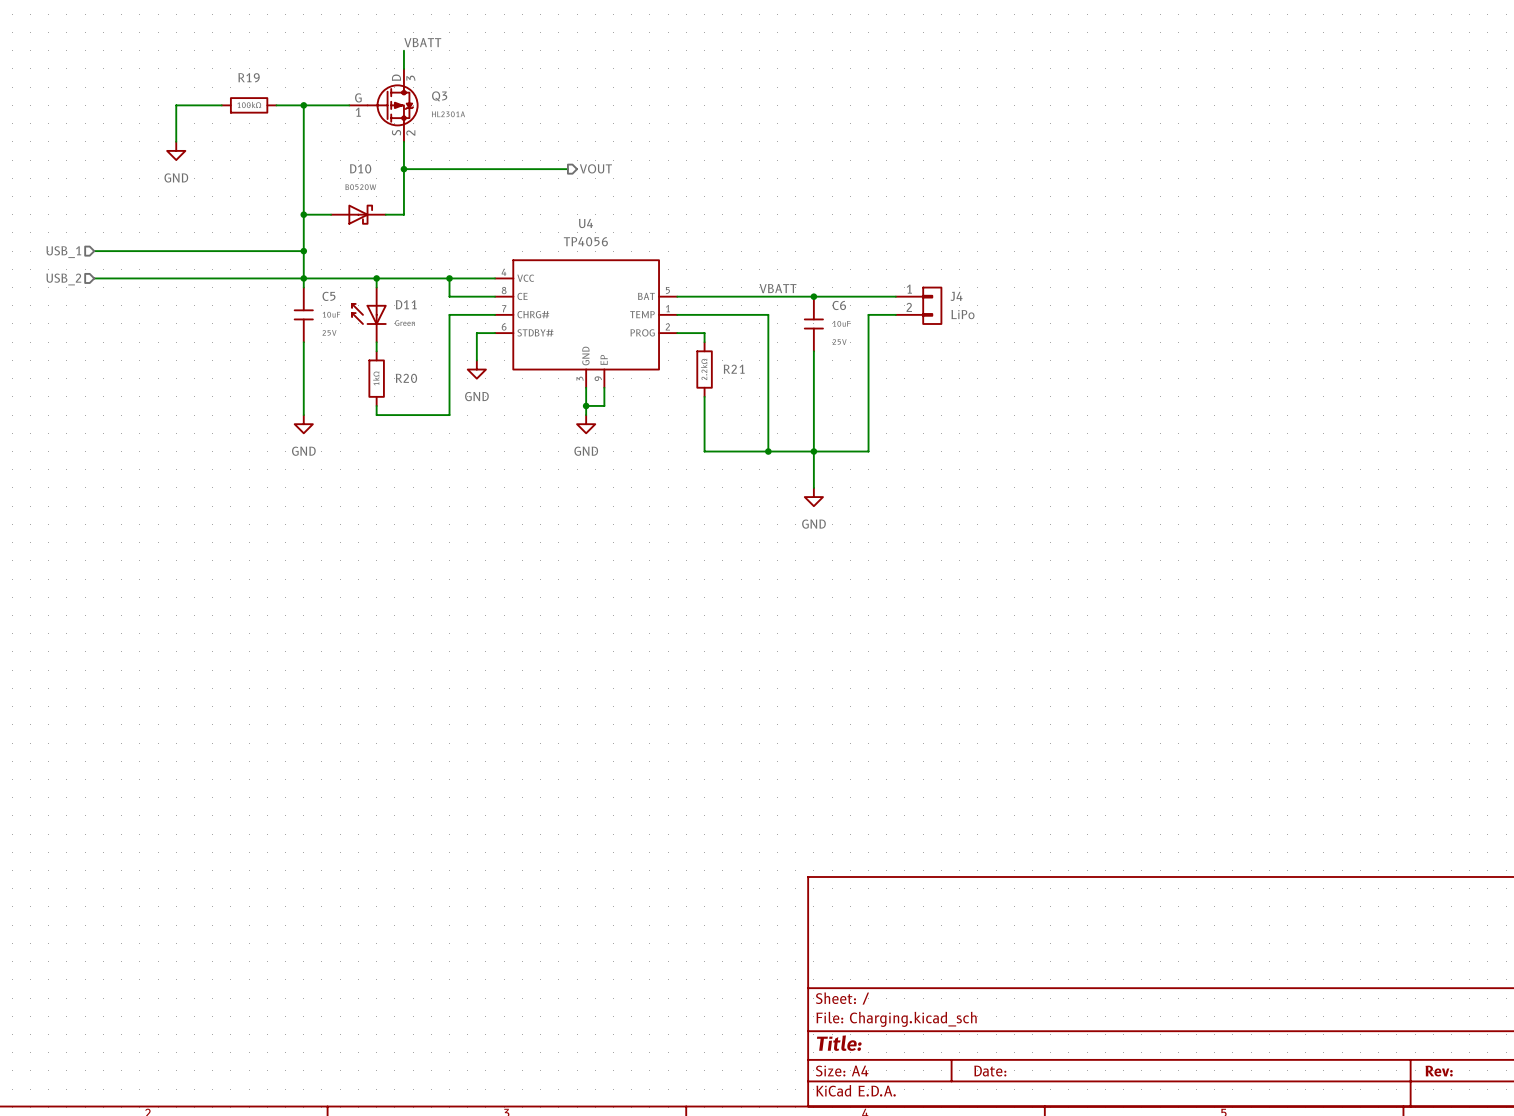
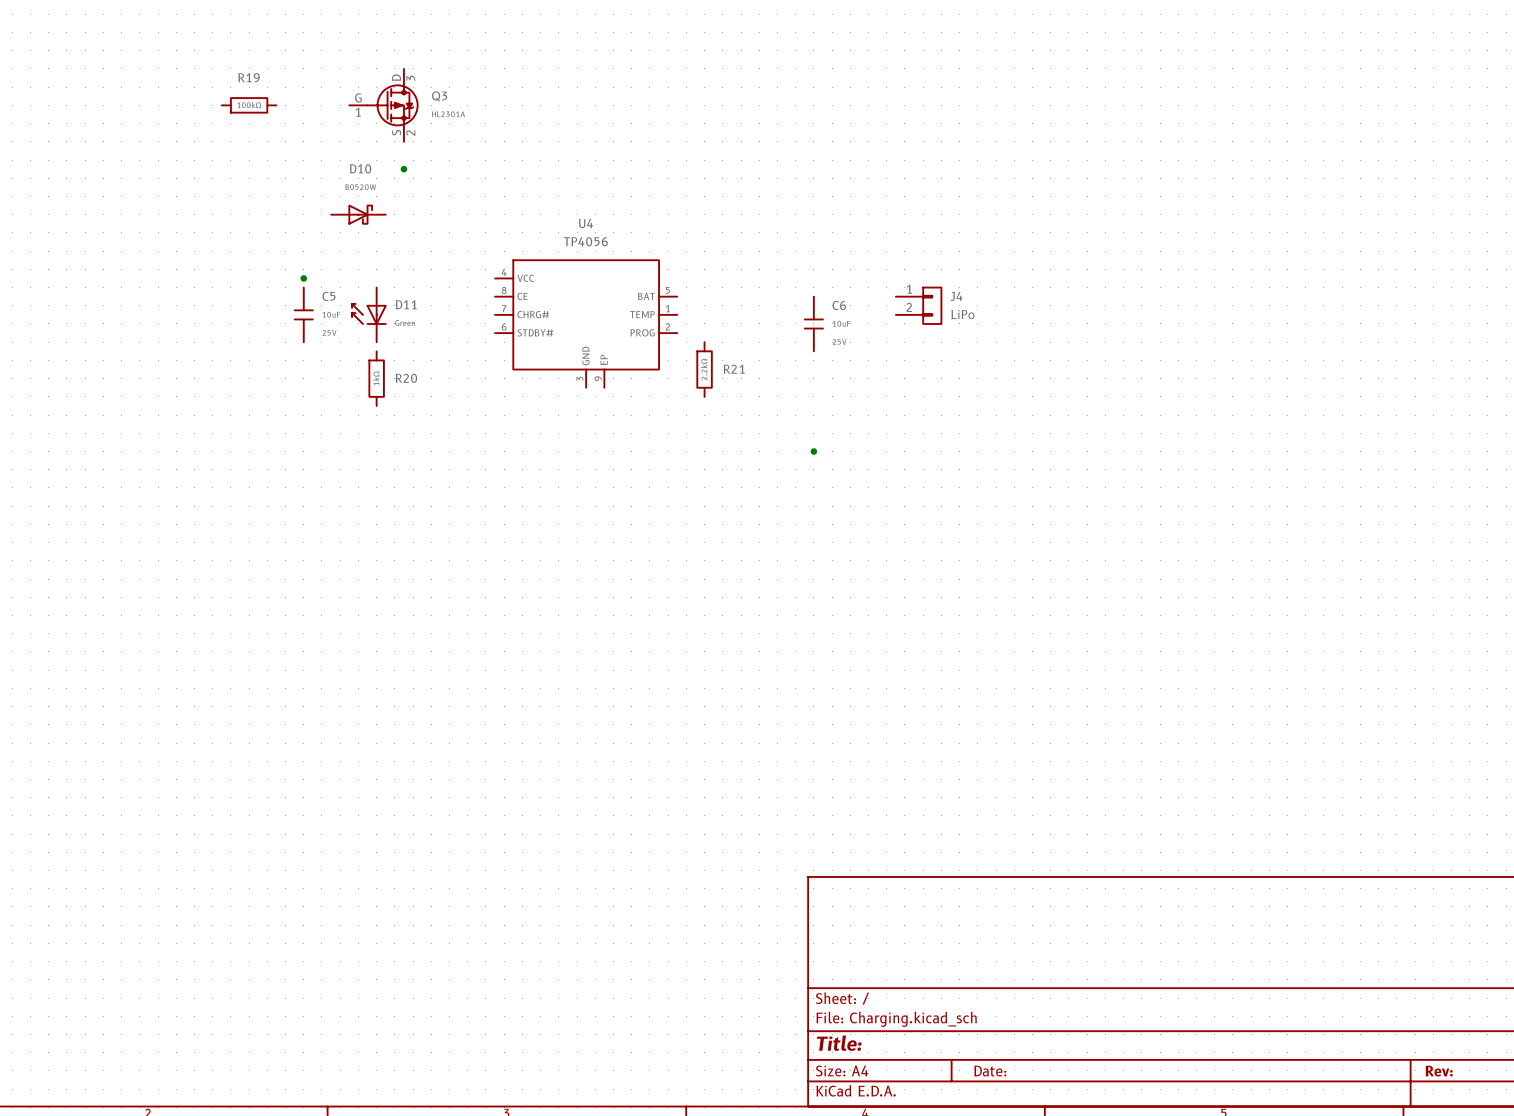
label: VBATT (422, 42) -> none
wire: (403, 50) (403, 68) -> none
wire: (221, 105) (176, 105) (176, 141) -> none
wire: (276, 105) (349, 105) -> none
wire: (303, 105) (303, 287) -> none
junction: (303, 105) -> none
wire: (403, 141) (403, 214) (385, 214) -> none
power symbol: GND (176, 150) -> none
hierarchical label: VOUT (595, 168) -> none
wire: (403, 169) (567, 169) -> none
wire: (303, 214) (331, 214) -> none
junction: (303, 214) -> none
wire: (94, 251) (303, 251) -> none
junction: (303, 251) -> none
hierarchical label: USB_1 (63, 252) -> none
wire: (94, 278) (495, 278) -> none
wire: (376, 278) (376, 287) -> none
junction: (376, 278) -> none
wire: (449, 278) (449, 296) (495, 296) -> none
junction: (449, 278) -> none
hierarchical label: USB_2 (63, 279) -> none
label: VBATT (778, 288) -> none
wire: (677, 296) (895, 296) -> none
junction: (813, 296) -> none
wire: (495, 314) (449, 314) (449, 415) (376, 415) (376, 405) -> none
wire: (677, 314) (768, 314) (768, 451) -> none
wire: (895, 314) (868, 314) (868, 451) (704, 451) (704, 396) -> none
wire: (495, 333) (476, 333) (476, 360) -> none
wire: (677, 333) (704, 333) (704, 342) -> none
wire: (303, 342) (303, 415) -> none
wire: (376, 342) (376, 351) -> none
wire: (813, 351) (813, 487) -> none
power symbol: GND (476, 369) -> none
wire: (586, 387) (586, 415) -> none
wire: (604, 387) (604, 405) (586, 405) -> none
junction: (586, 405) -> none
power symbol: GND (303, 424) -> none
power symbol: GND (586, 424) -> none
junction: (768, 451) -> none
power symbol: GND (813, 497) -> none

